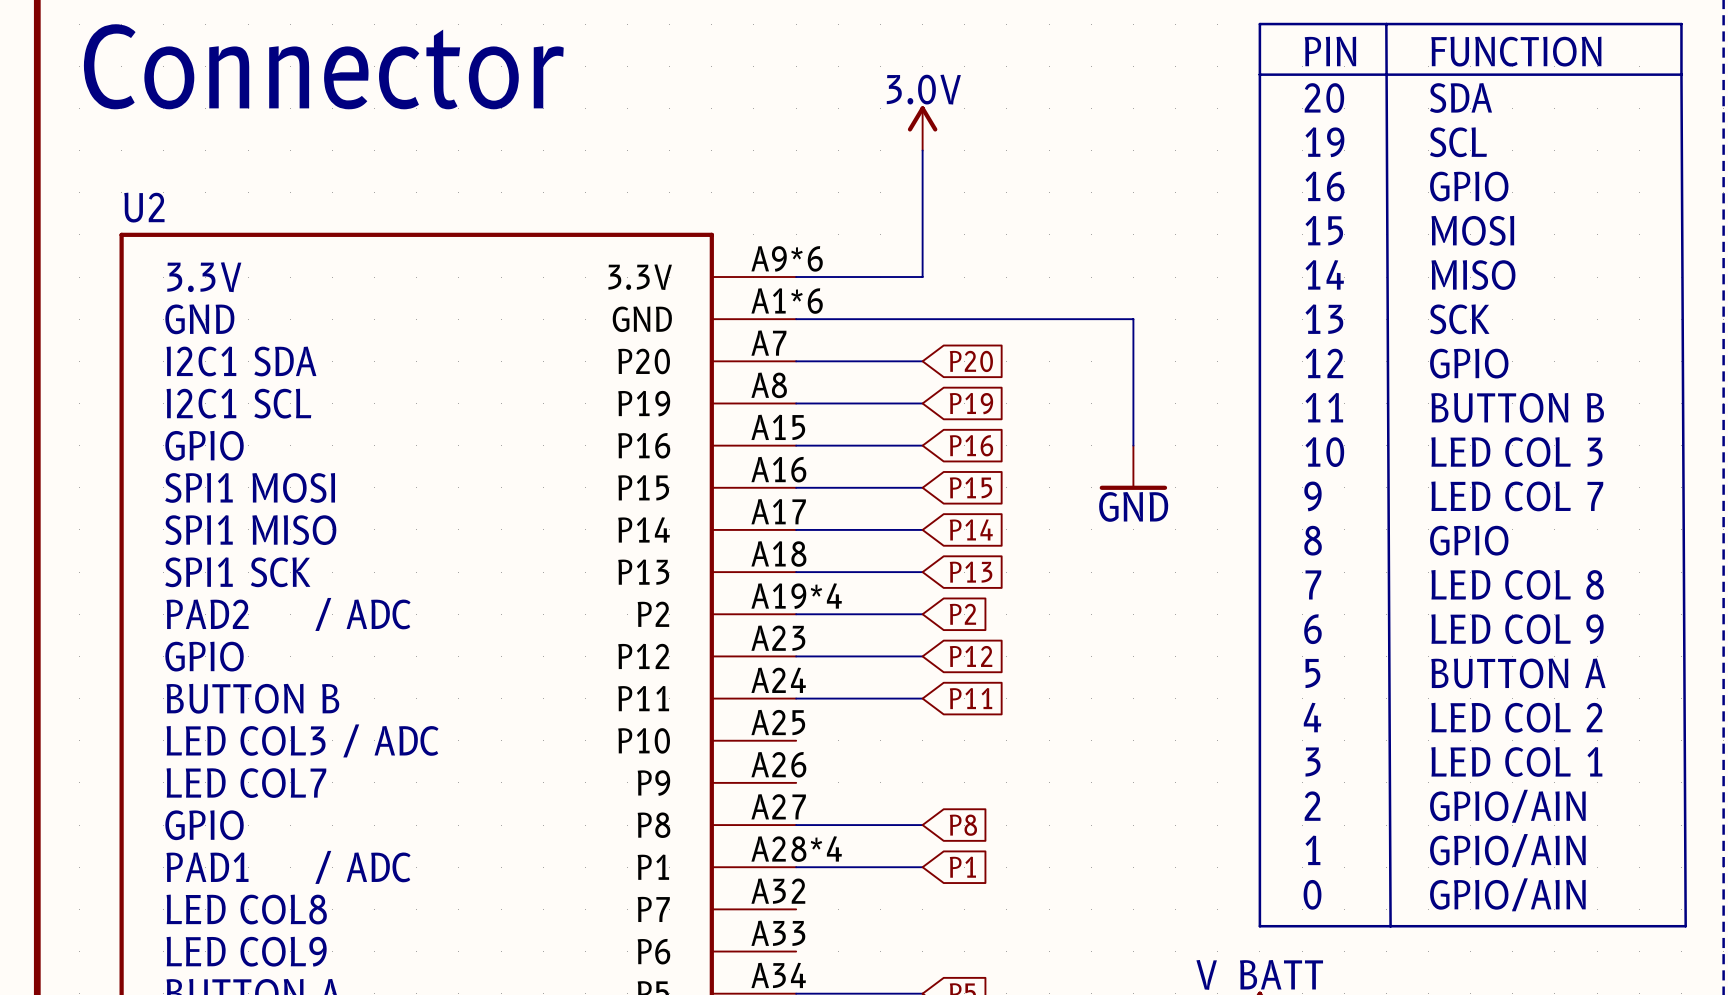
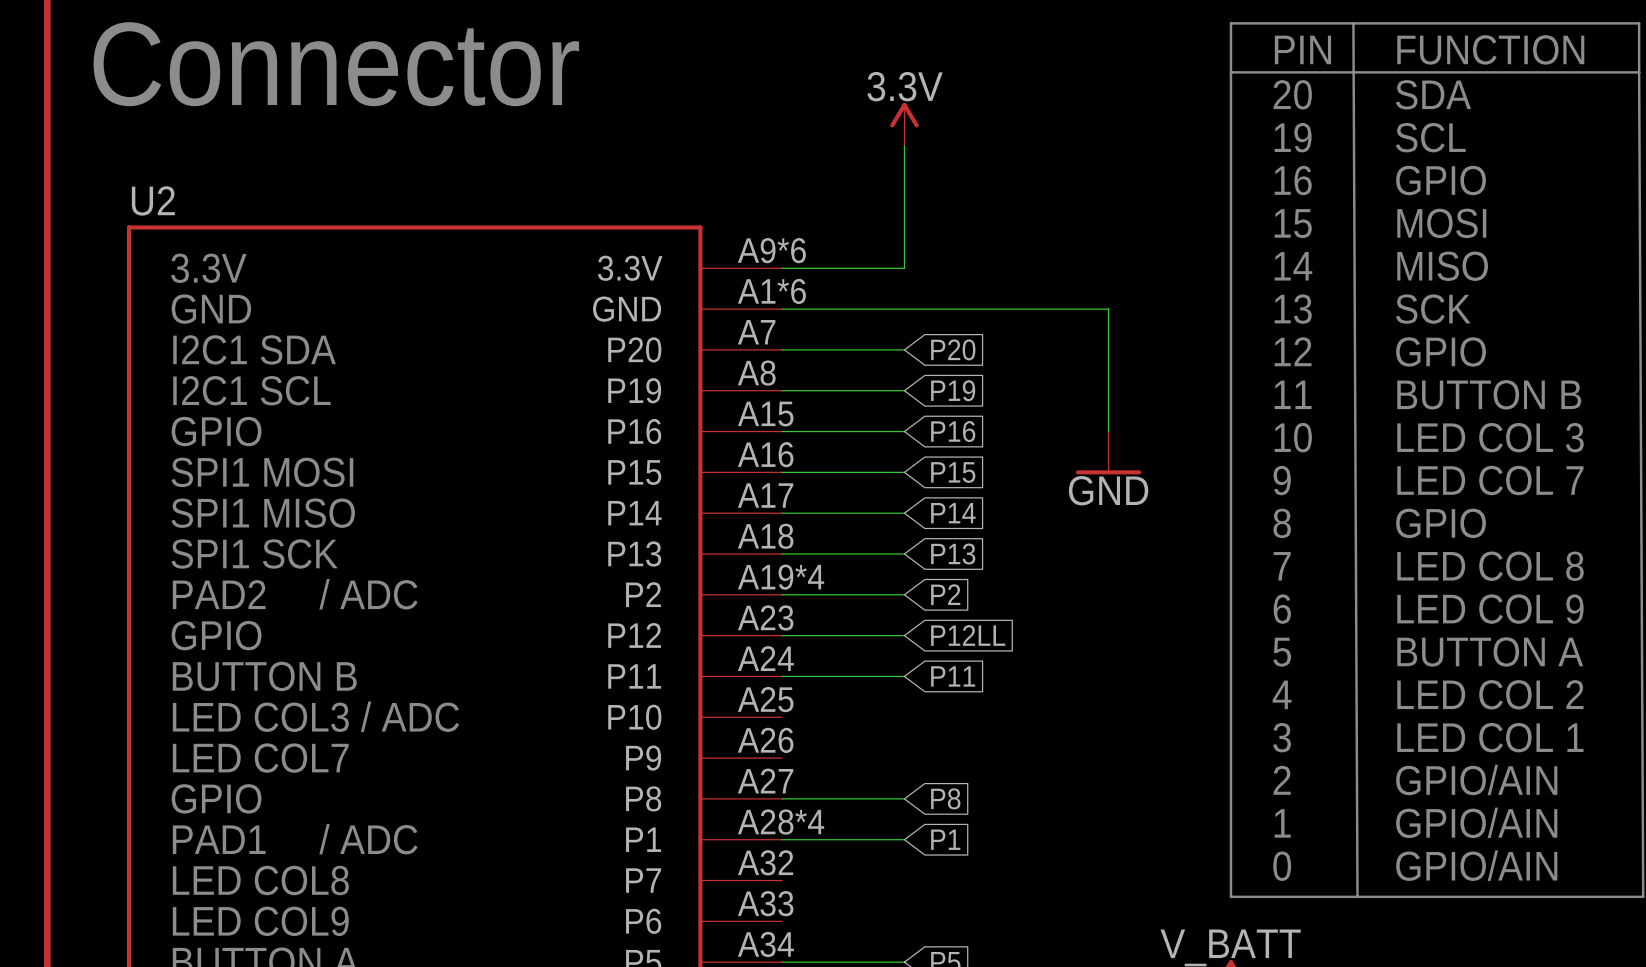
power symbol: 3.0V (922, 128) -> 3.3V (904, 124)
global label: P12 (971, 656) -> P12LL (968, 635)

